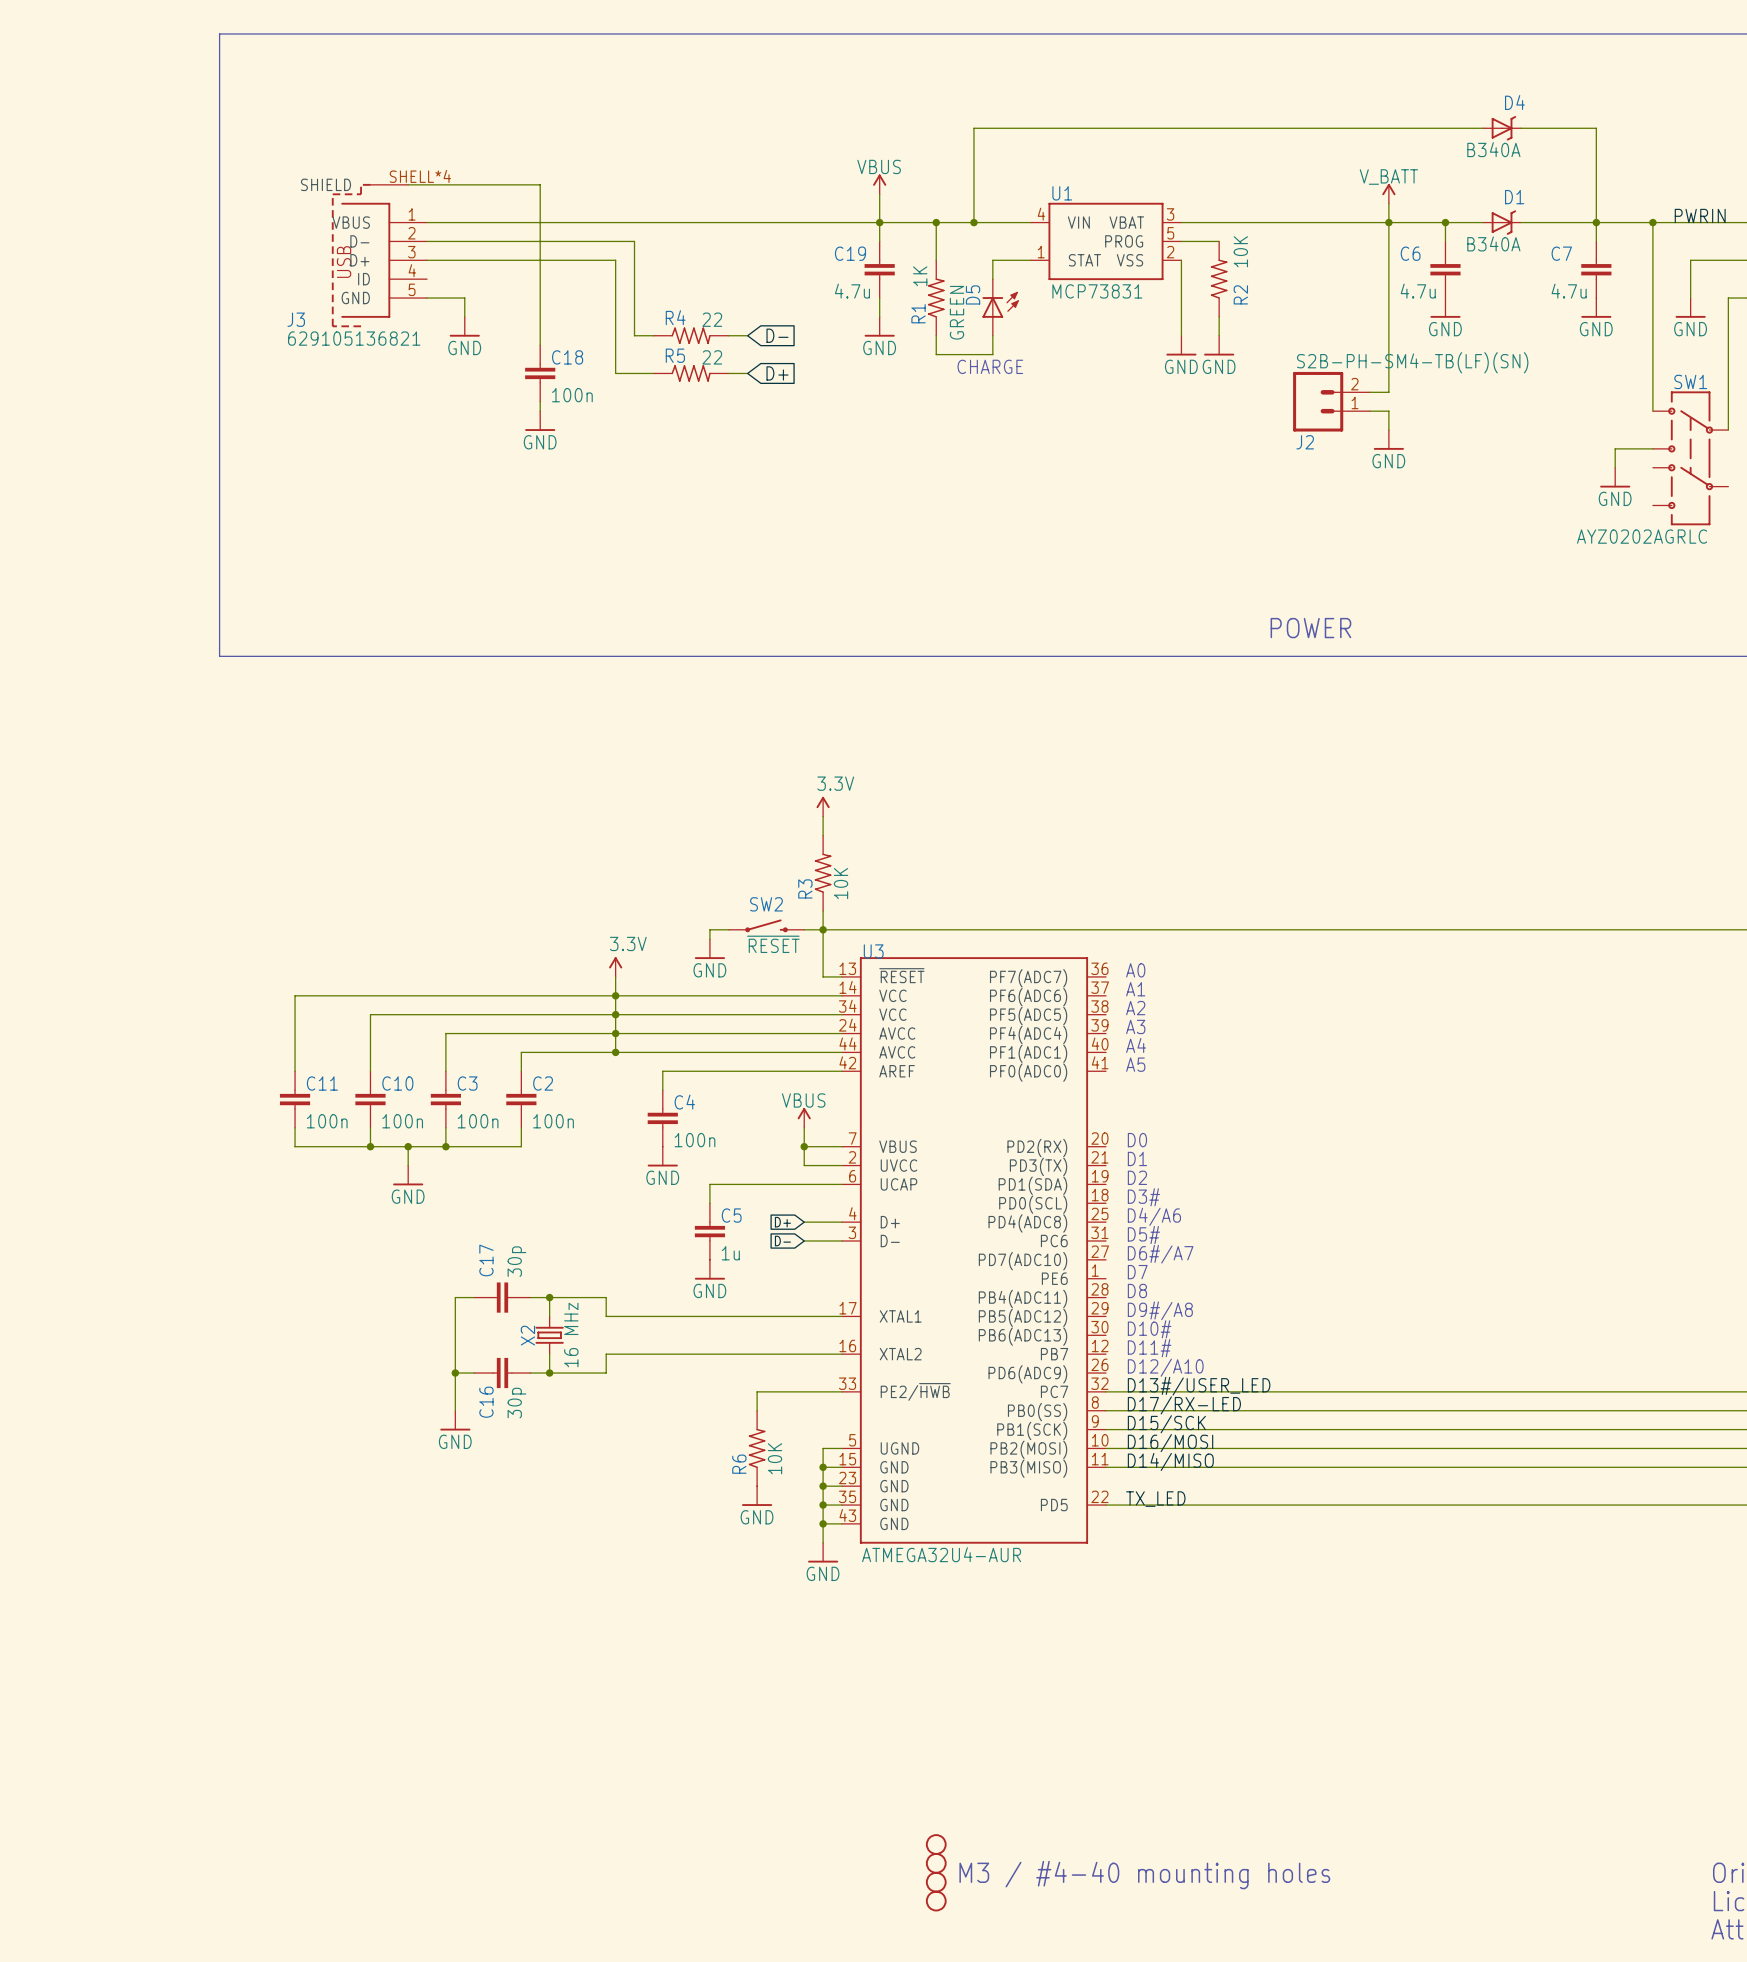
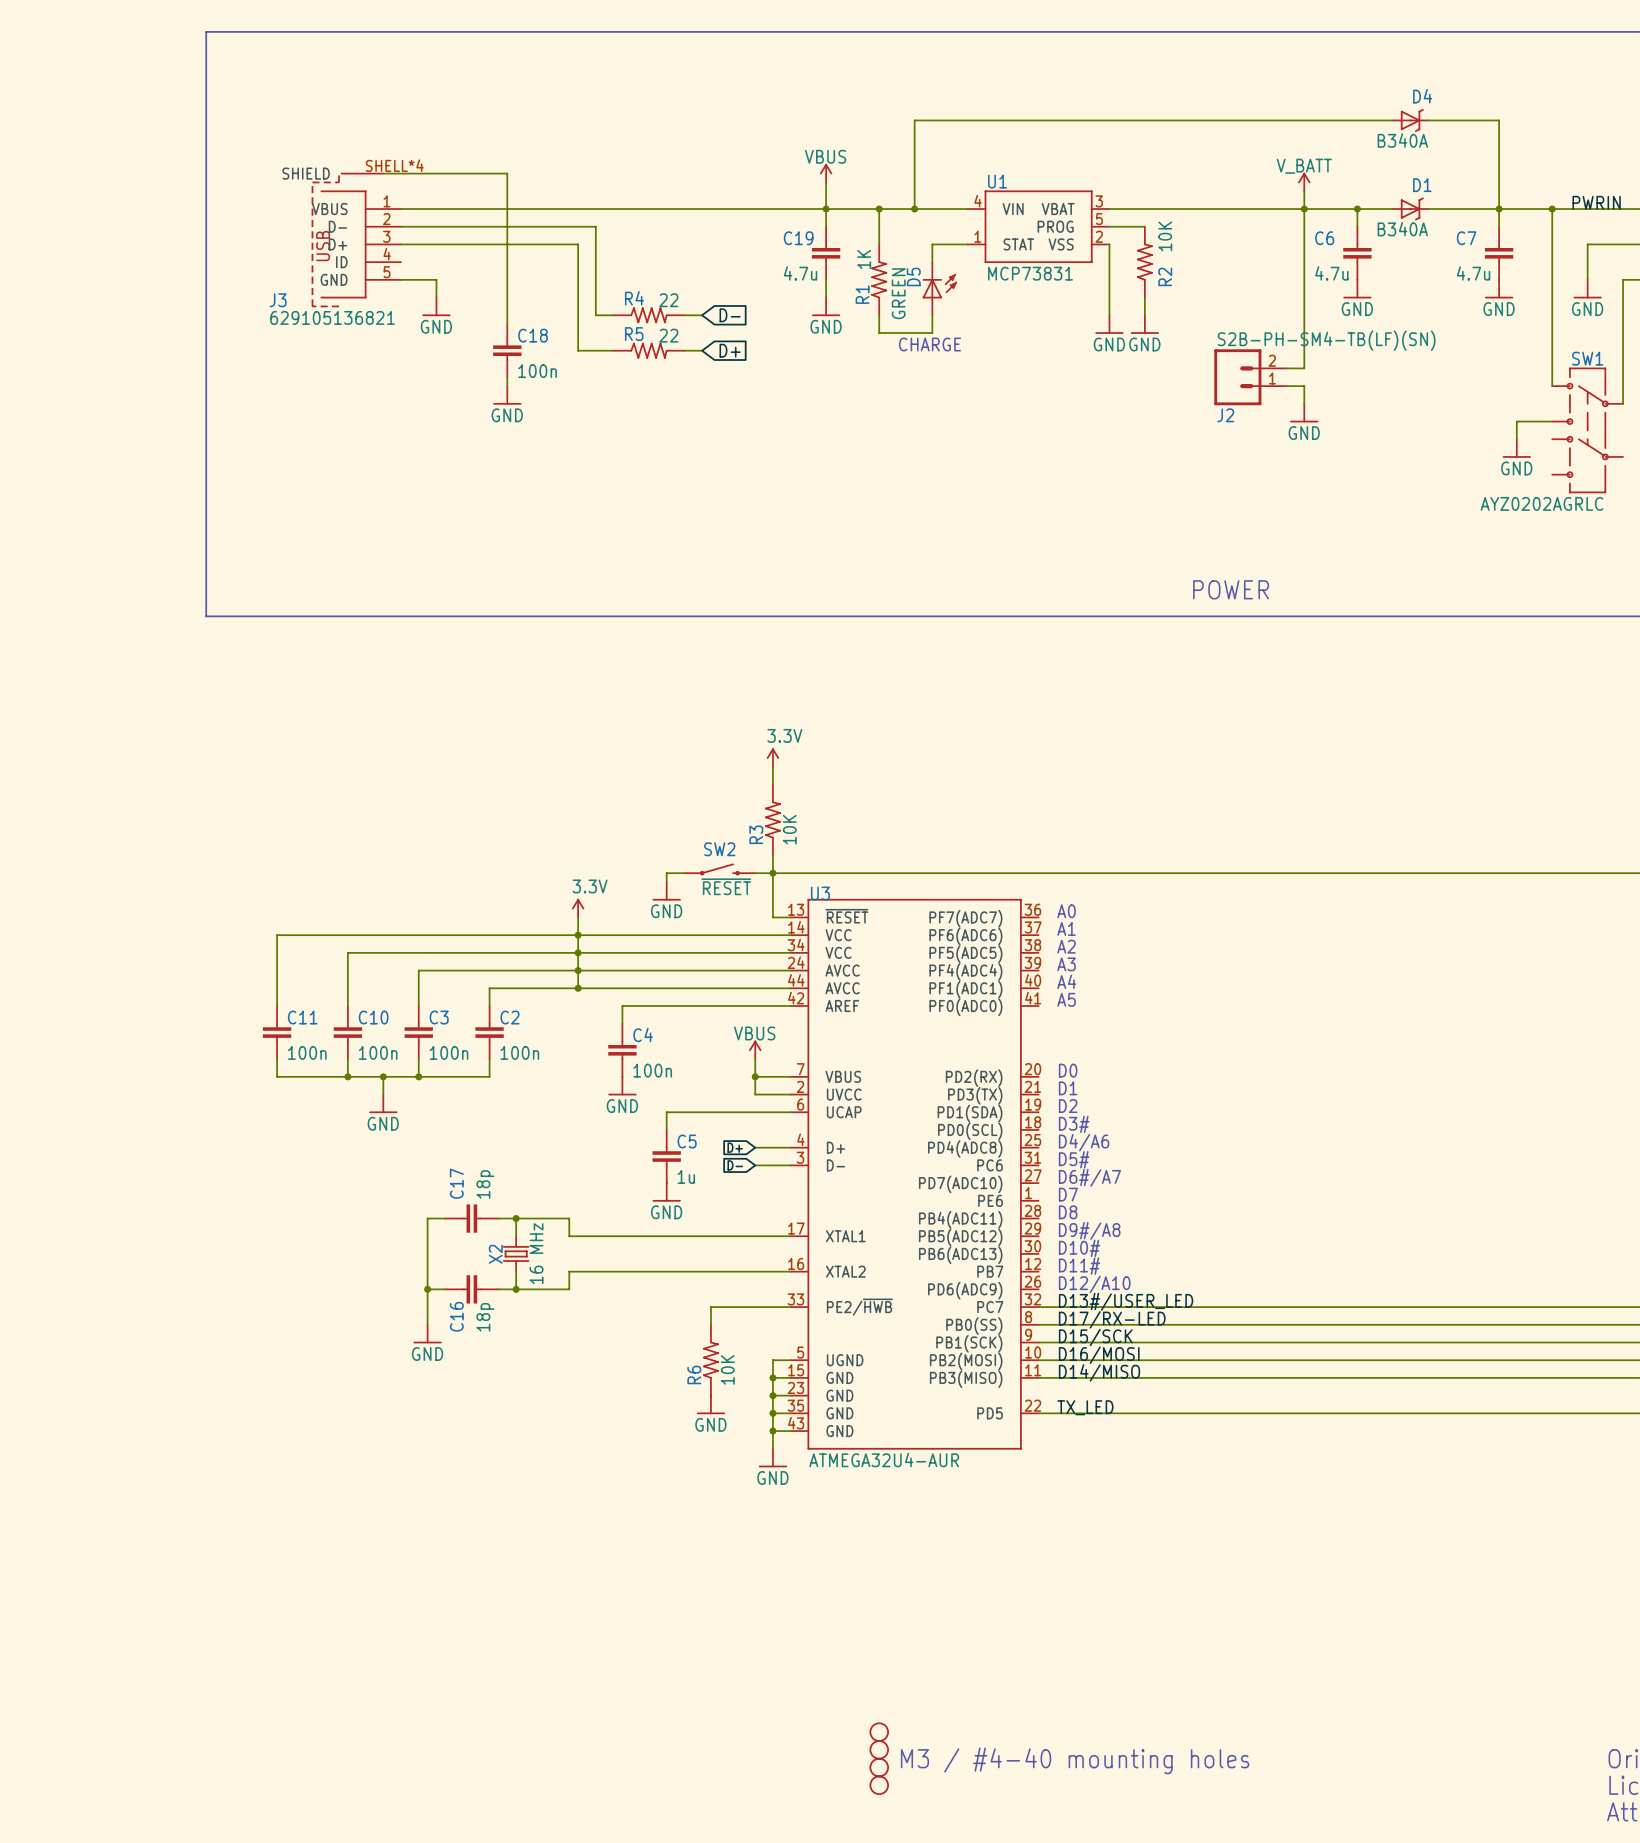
C17 value: 30p (516, 1261) -> 18p (485, 1184)
C16 value: 30p (516, 1403) -> 18p (485, 1317)

